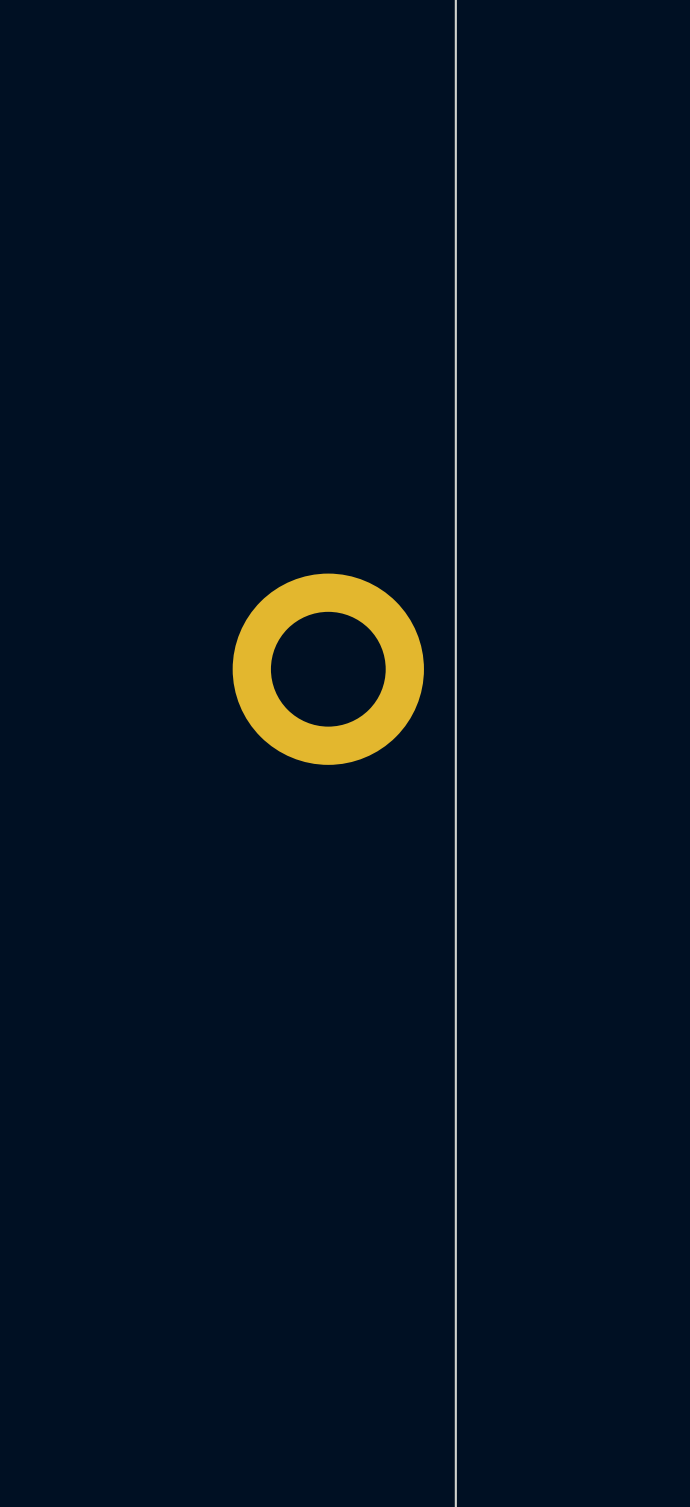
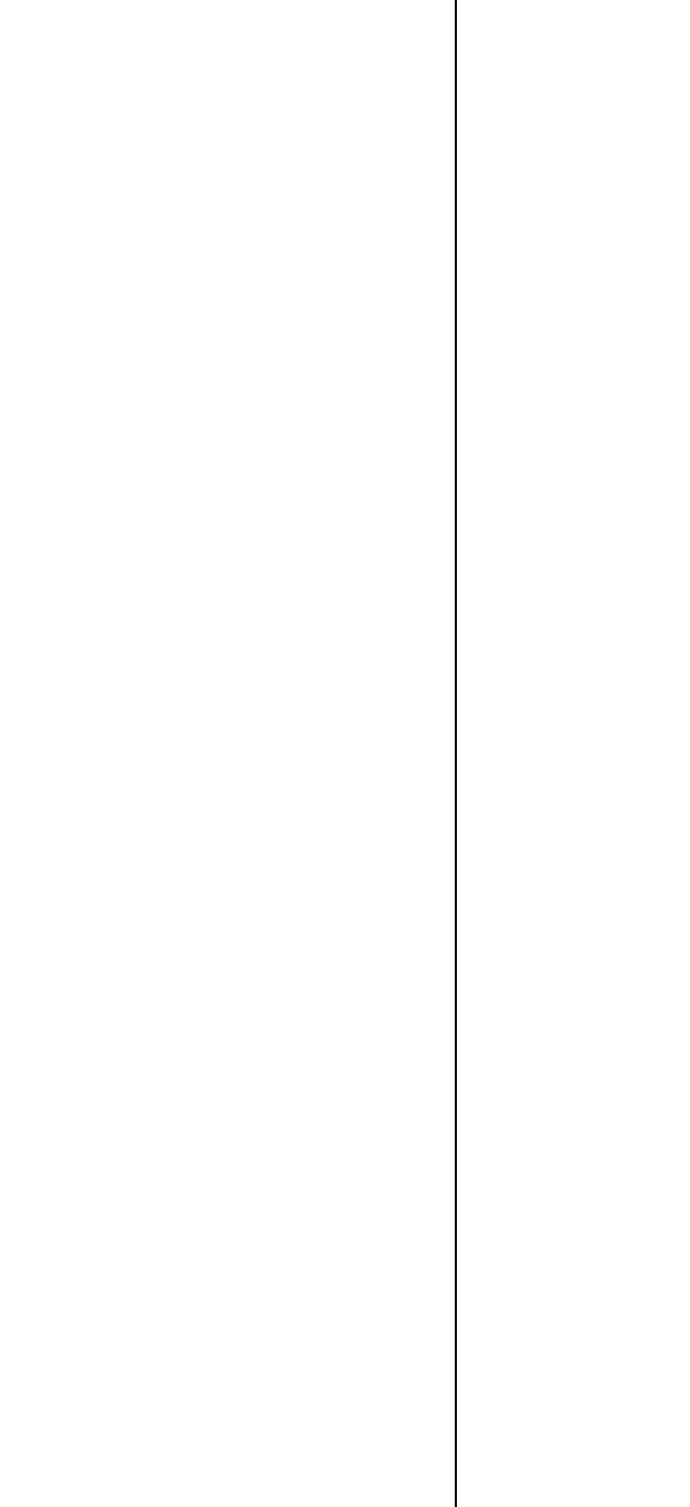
part: (328, 669) -> none

